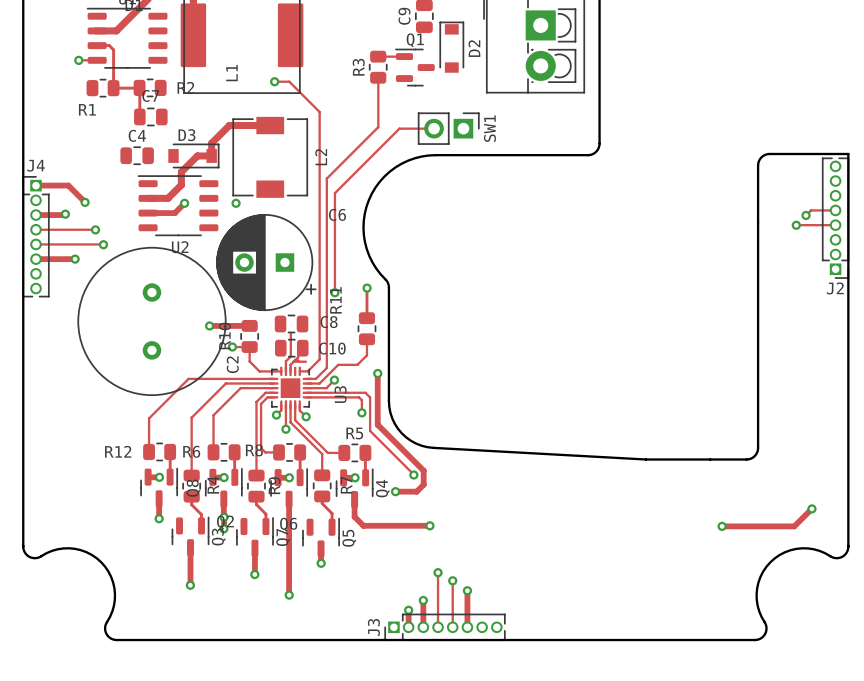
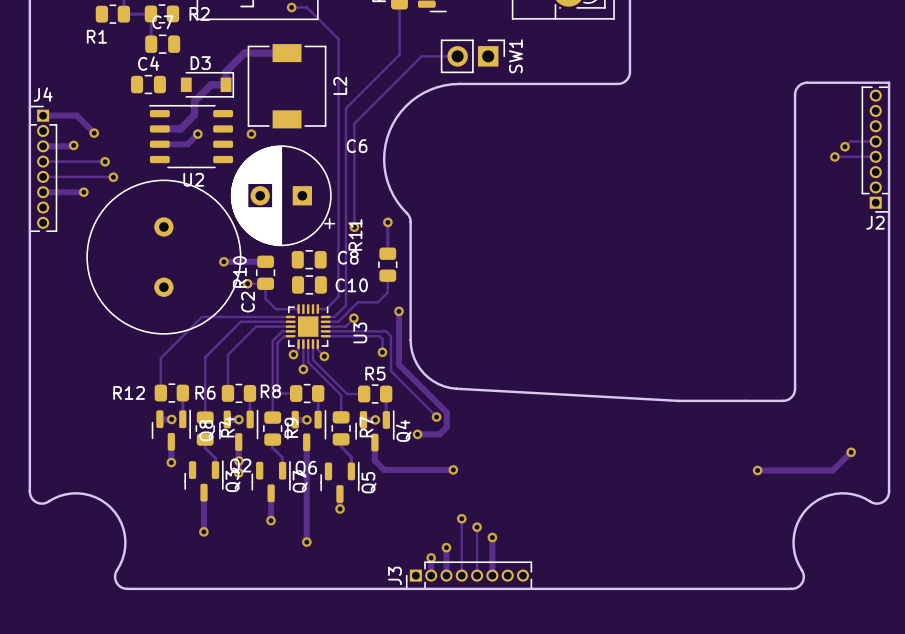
track: (290, 334) (290, 356) (285, 361) (285, 371) -> none
track: (298, 348) (298, 357) (290, 364) (290, 371) -> none
track: (295, 360) (298, 360) -> none
track: (293, 361) (306, 361) -> none

